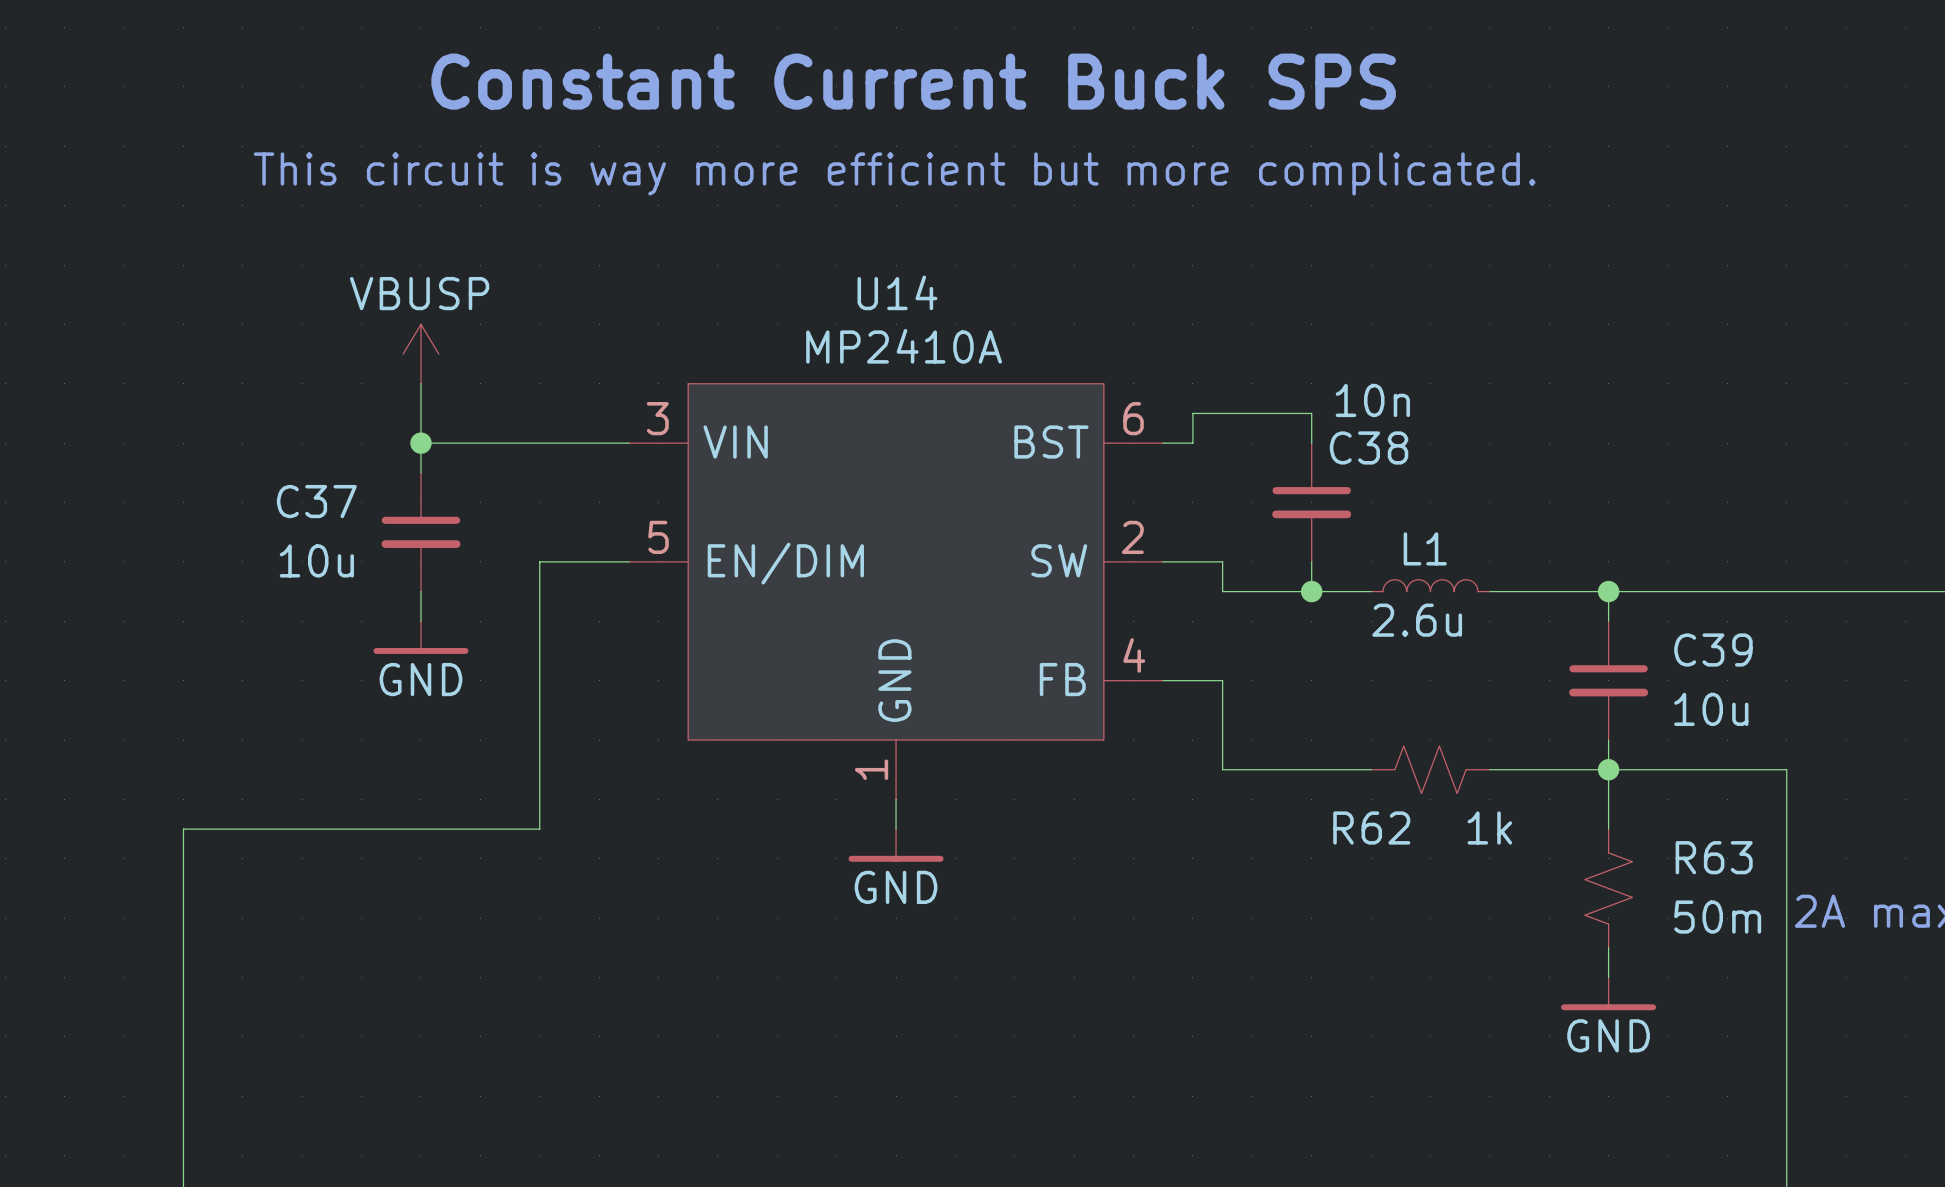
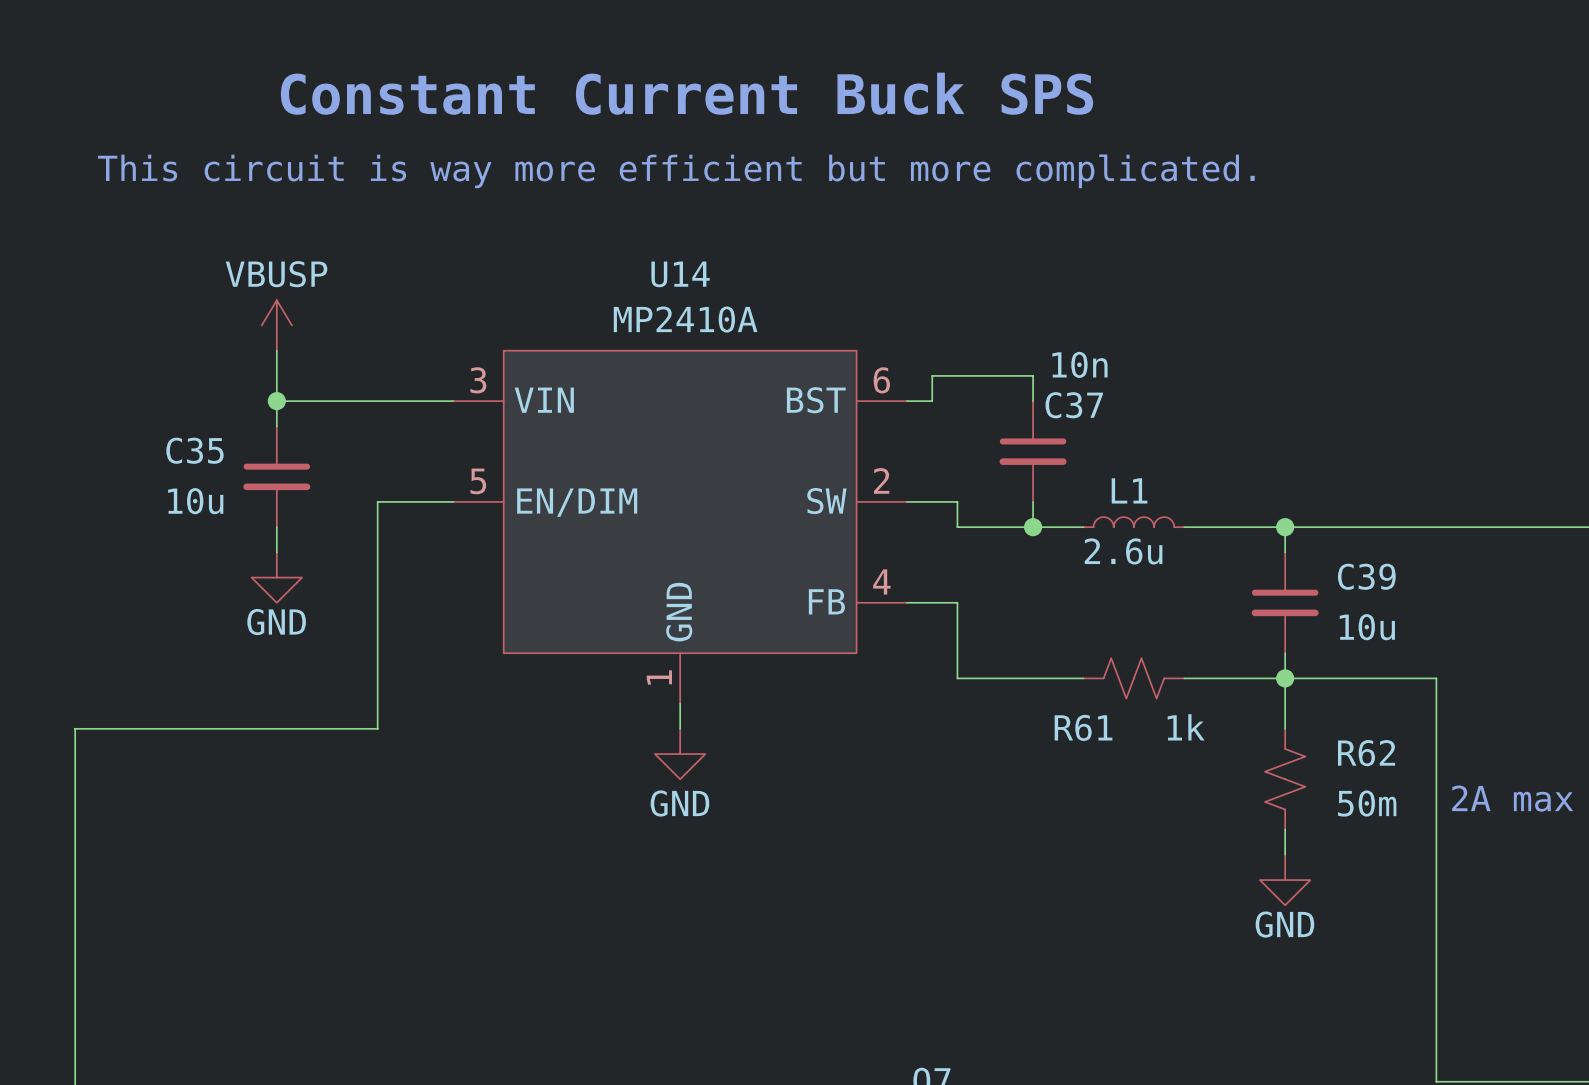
C38 name: C38 (1369, 447) -> C37 (1074, 405)
C37 name: C37 (316, 501) -> C35 (194, 450)
power symbol shape: [373, 621, 469, 654] -> [251, 552, 303, 603]
R62 name: R62 (1371, 828) -> R61 (1083, 727)
power symbol shape: [848, 829, 944, 862] -> [654, 728, 706, 780]
R63 name: R63 (1714, 857) -> R62 (1366, 753)
power symbol shape: [1561, 977, 1657, 1011] -> [1259, 854, 1311, 906]

